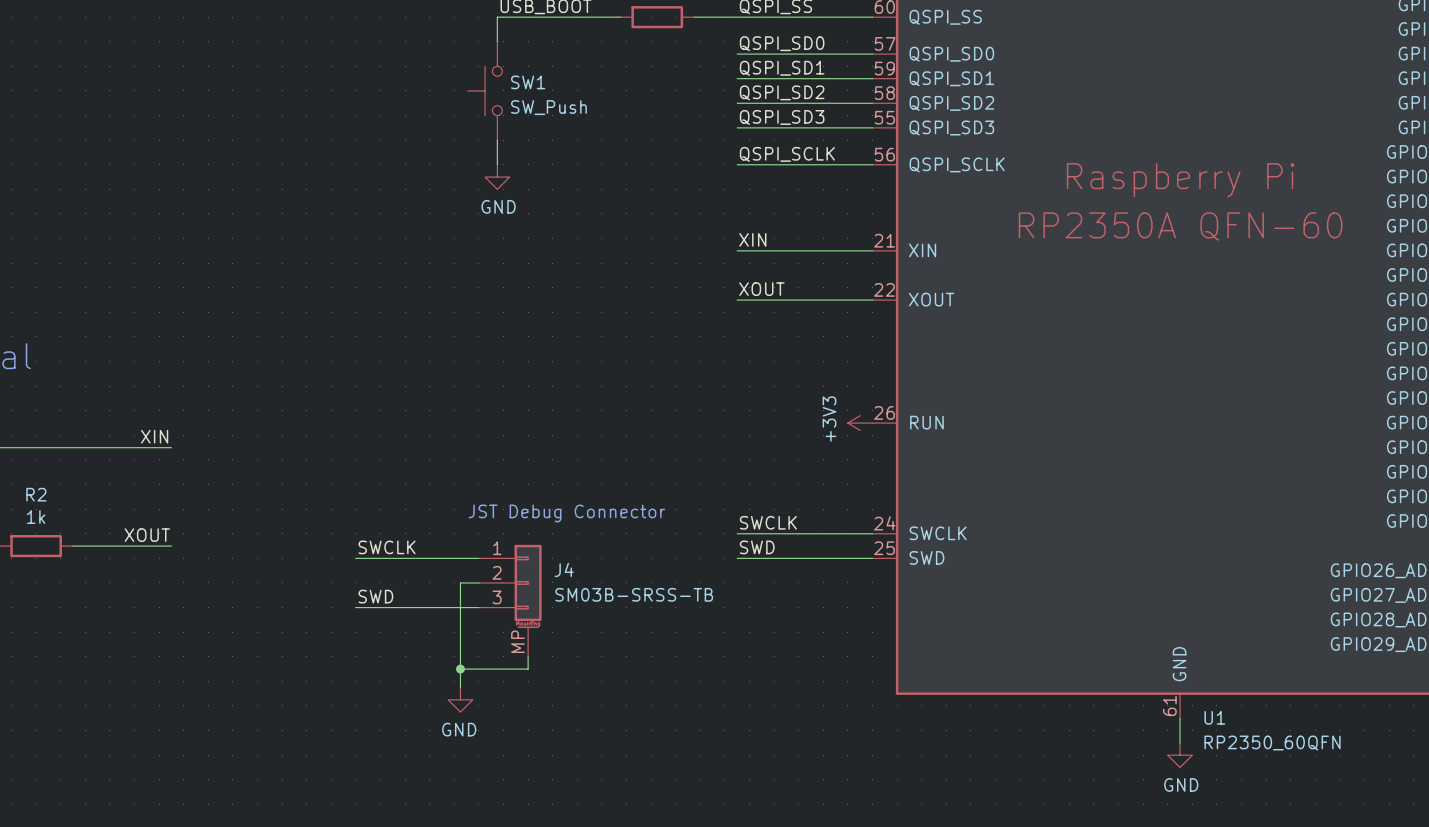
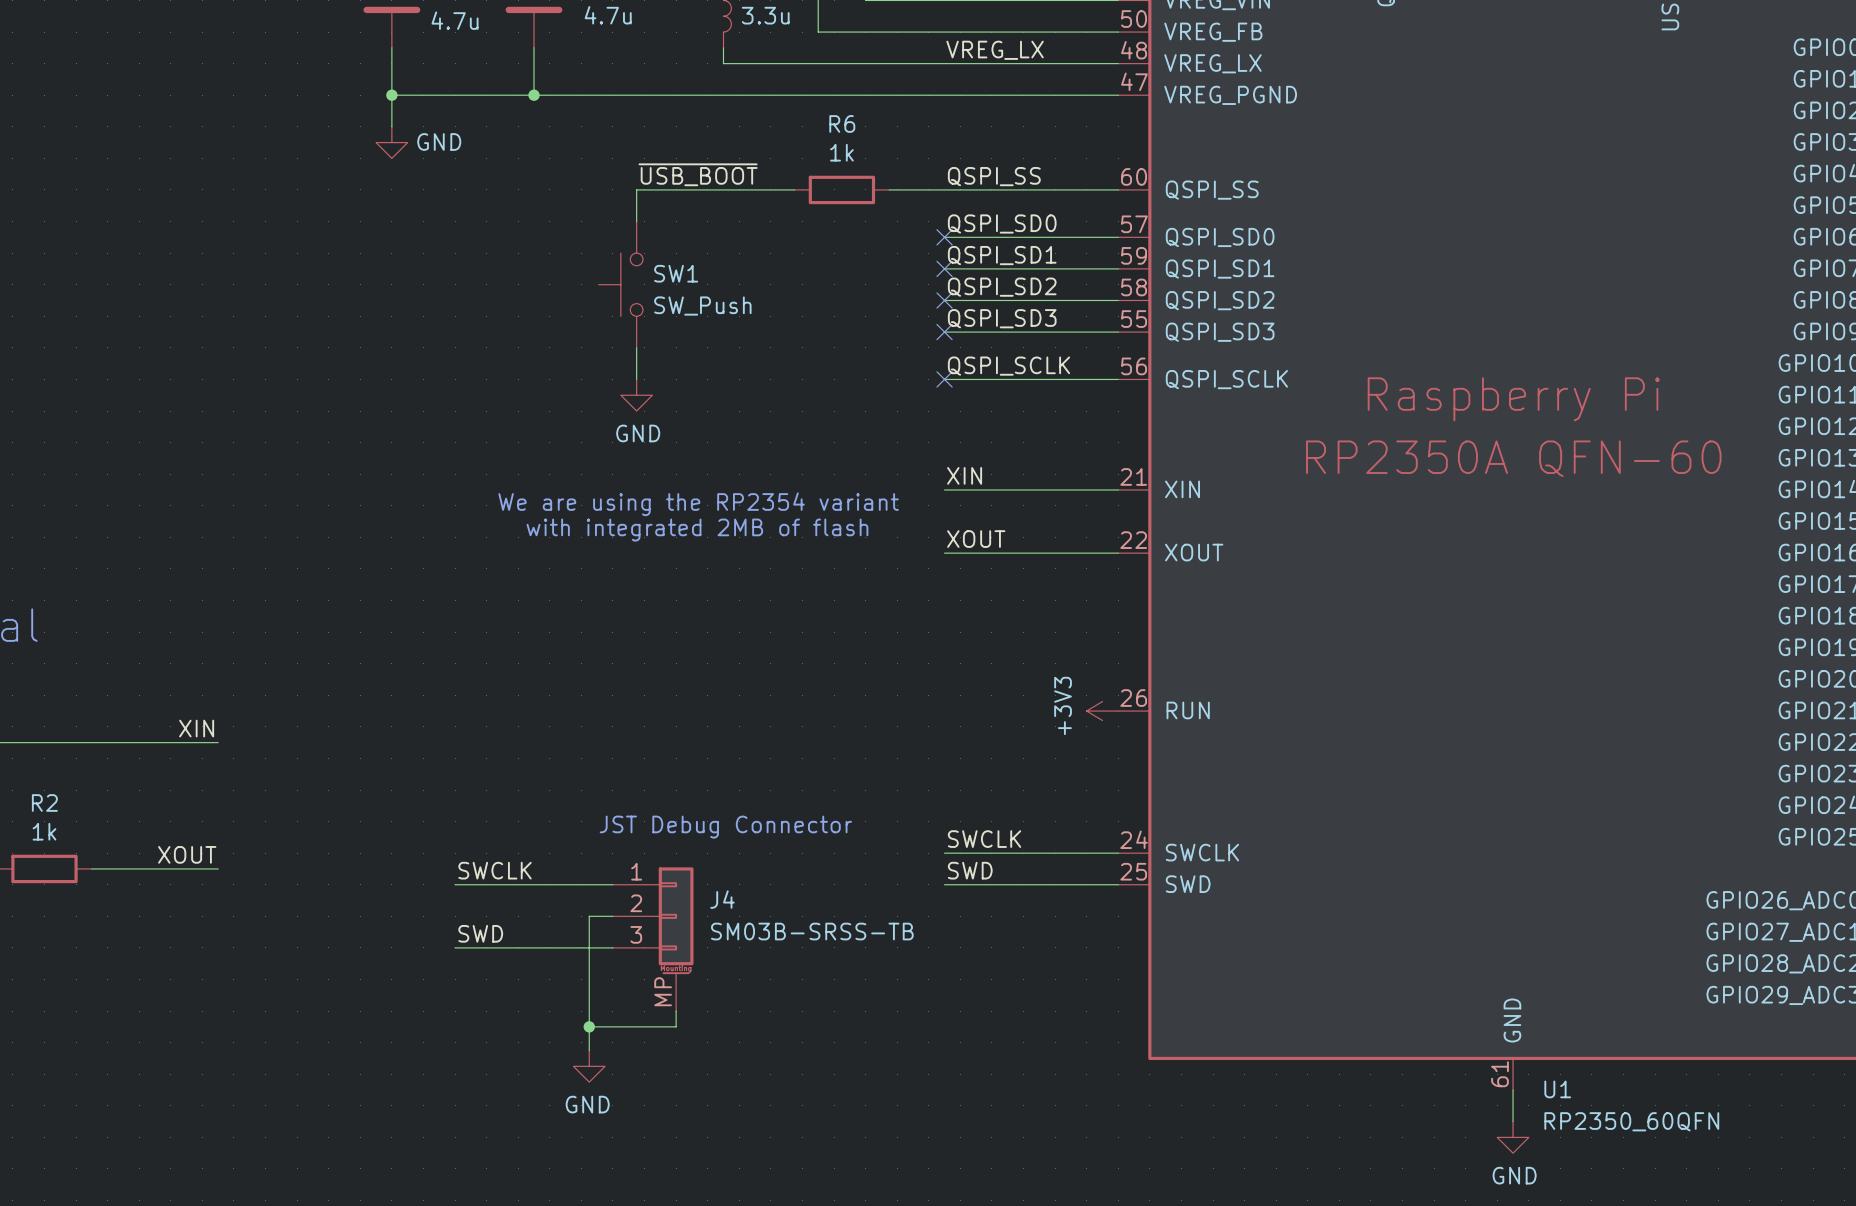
no-connect mark: none -> (944, 237)
no-connect mark: none -> (944, 268)
no-connect mark: none -> (944, 300)
no-connect mark: none -> (944, 332)
no-connect mark: none -> (944, 379)
text: none -> We are using the RP2354 variant (698, 504)
text: none -> with integrated 2MB of flash (697, 530)

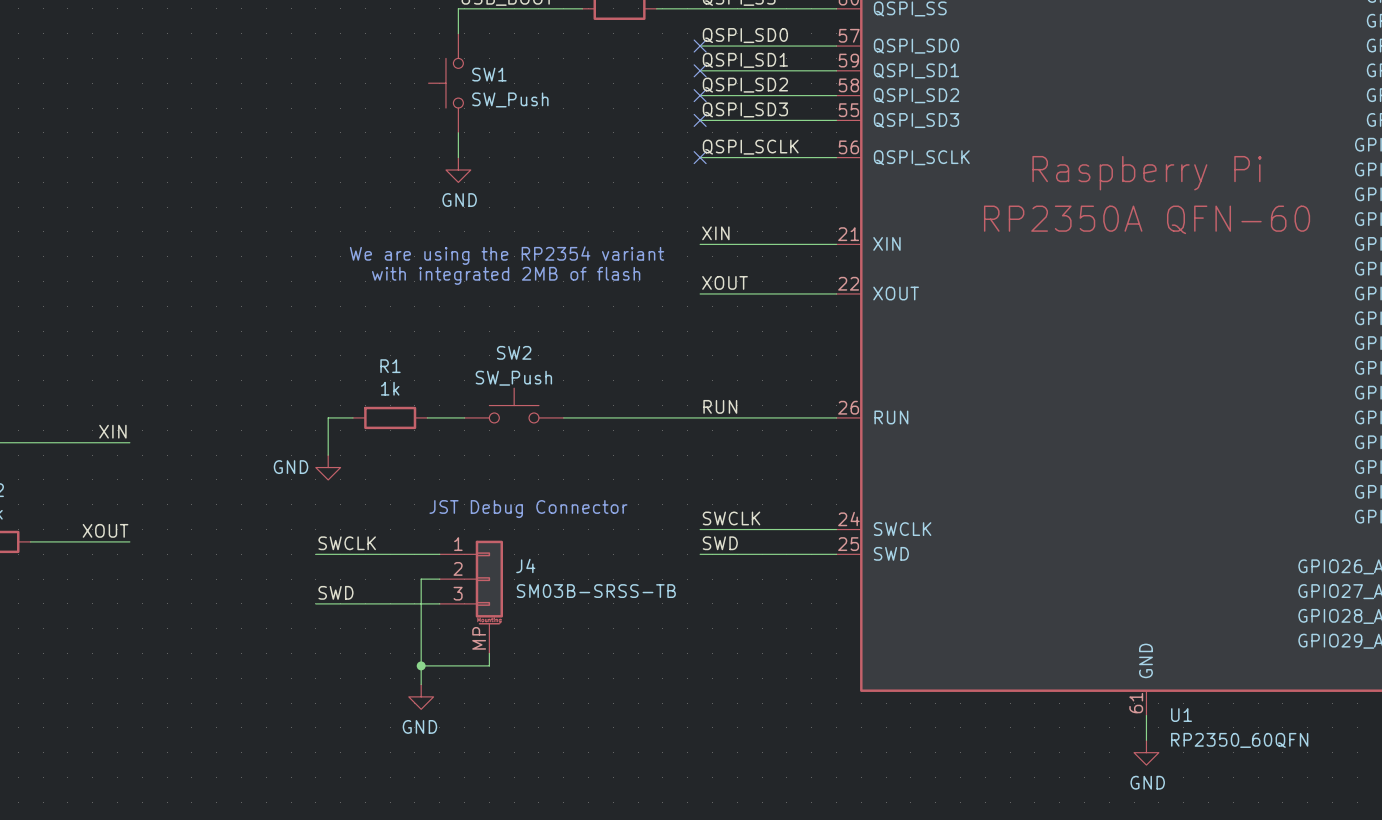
SW2: none -> SW_Push (514, 405)
label: none -> RUN (720, 406)
wire: none -> (353, 417) (328, 417) (328, 455)
R1: none -> 1k (390, 417)
wire: none -> (427, 417) (464, 417)
wire: none -> (563, 417) (836, 417)
power symbol: +3V3 (1102, 711) -> none
power symbol: none -> GND (328, 467)

